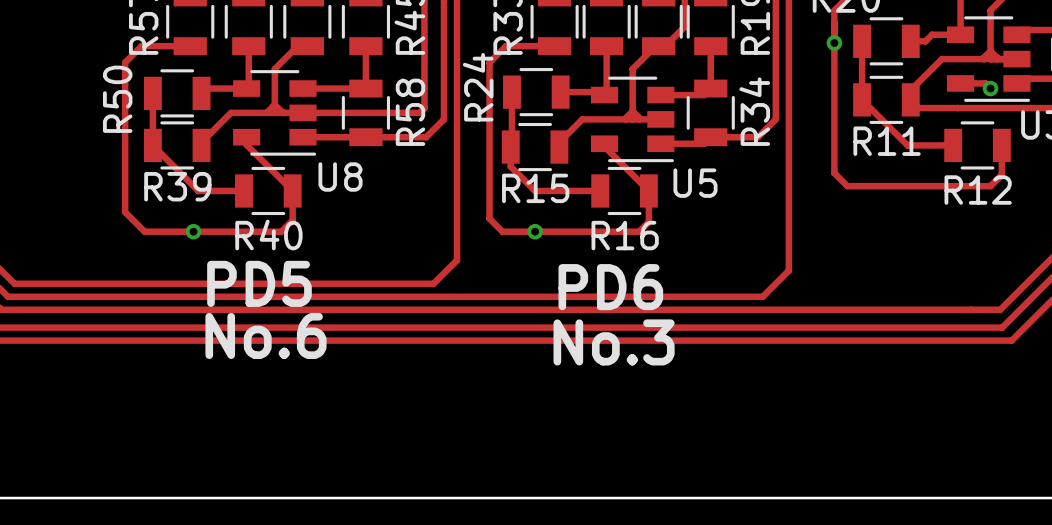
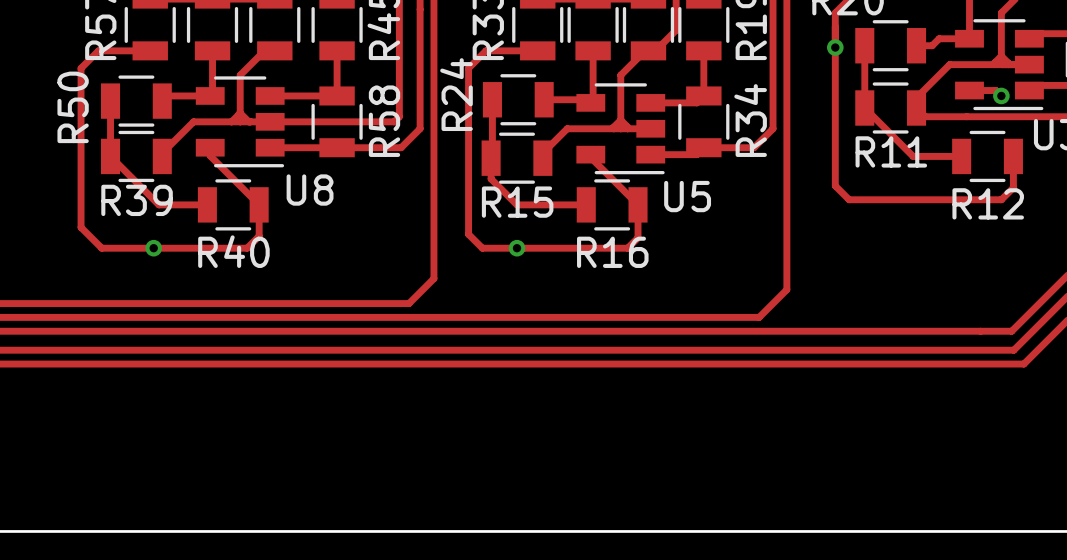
text: PD5 (259, 283) -> none
text: PD6 (610, 287) -> none
text: No.6 (265, 335) -> none
text: No.3 (614, 342) -> none

